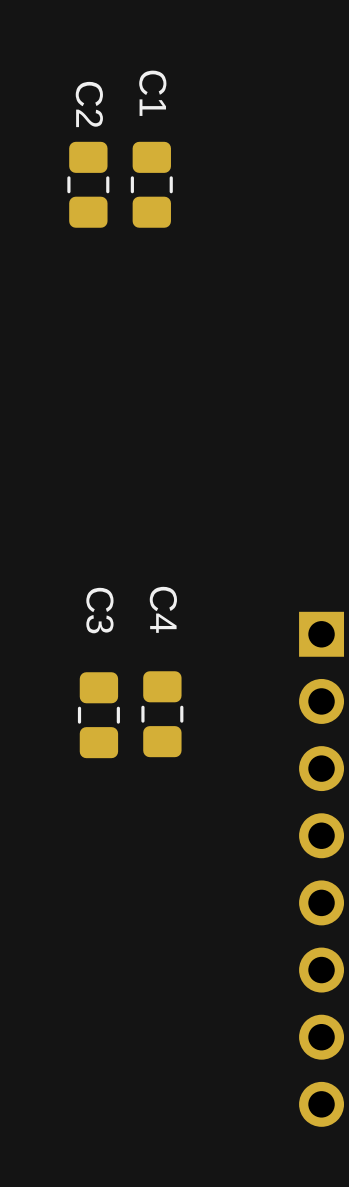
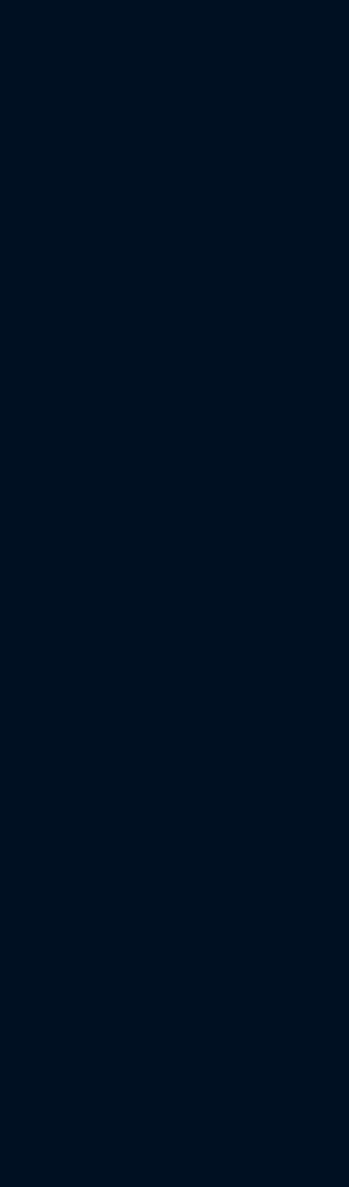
C2: (88, 184) -> none
C1: (151, 184) -> none
C4: (162, 714) -> none
C3: (98, 715) -> none
part: (321, 869) -> none

